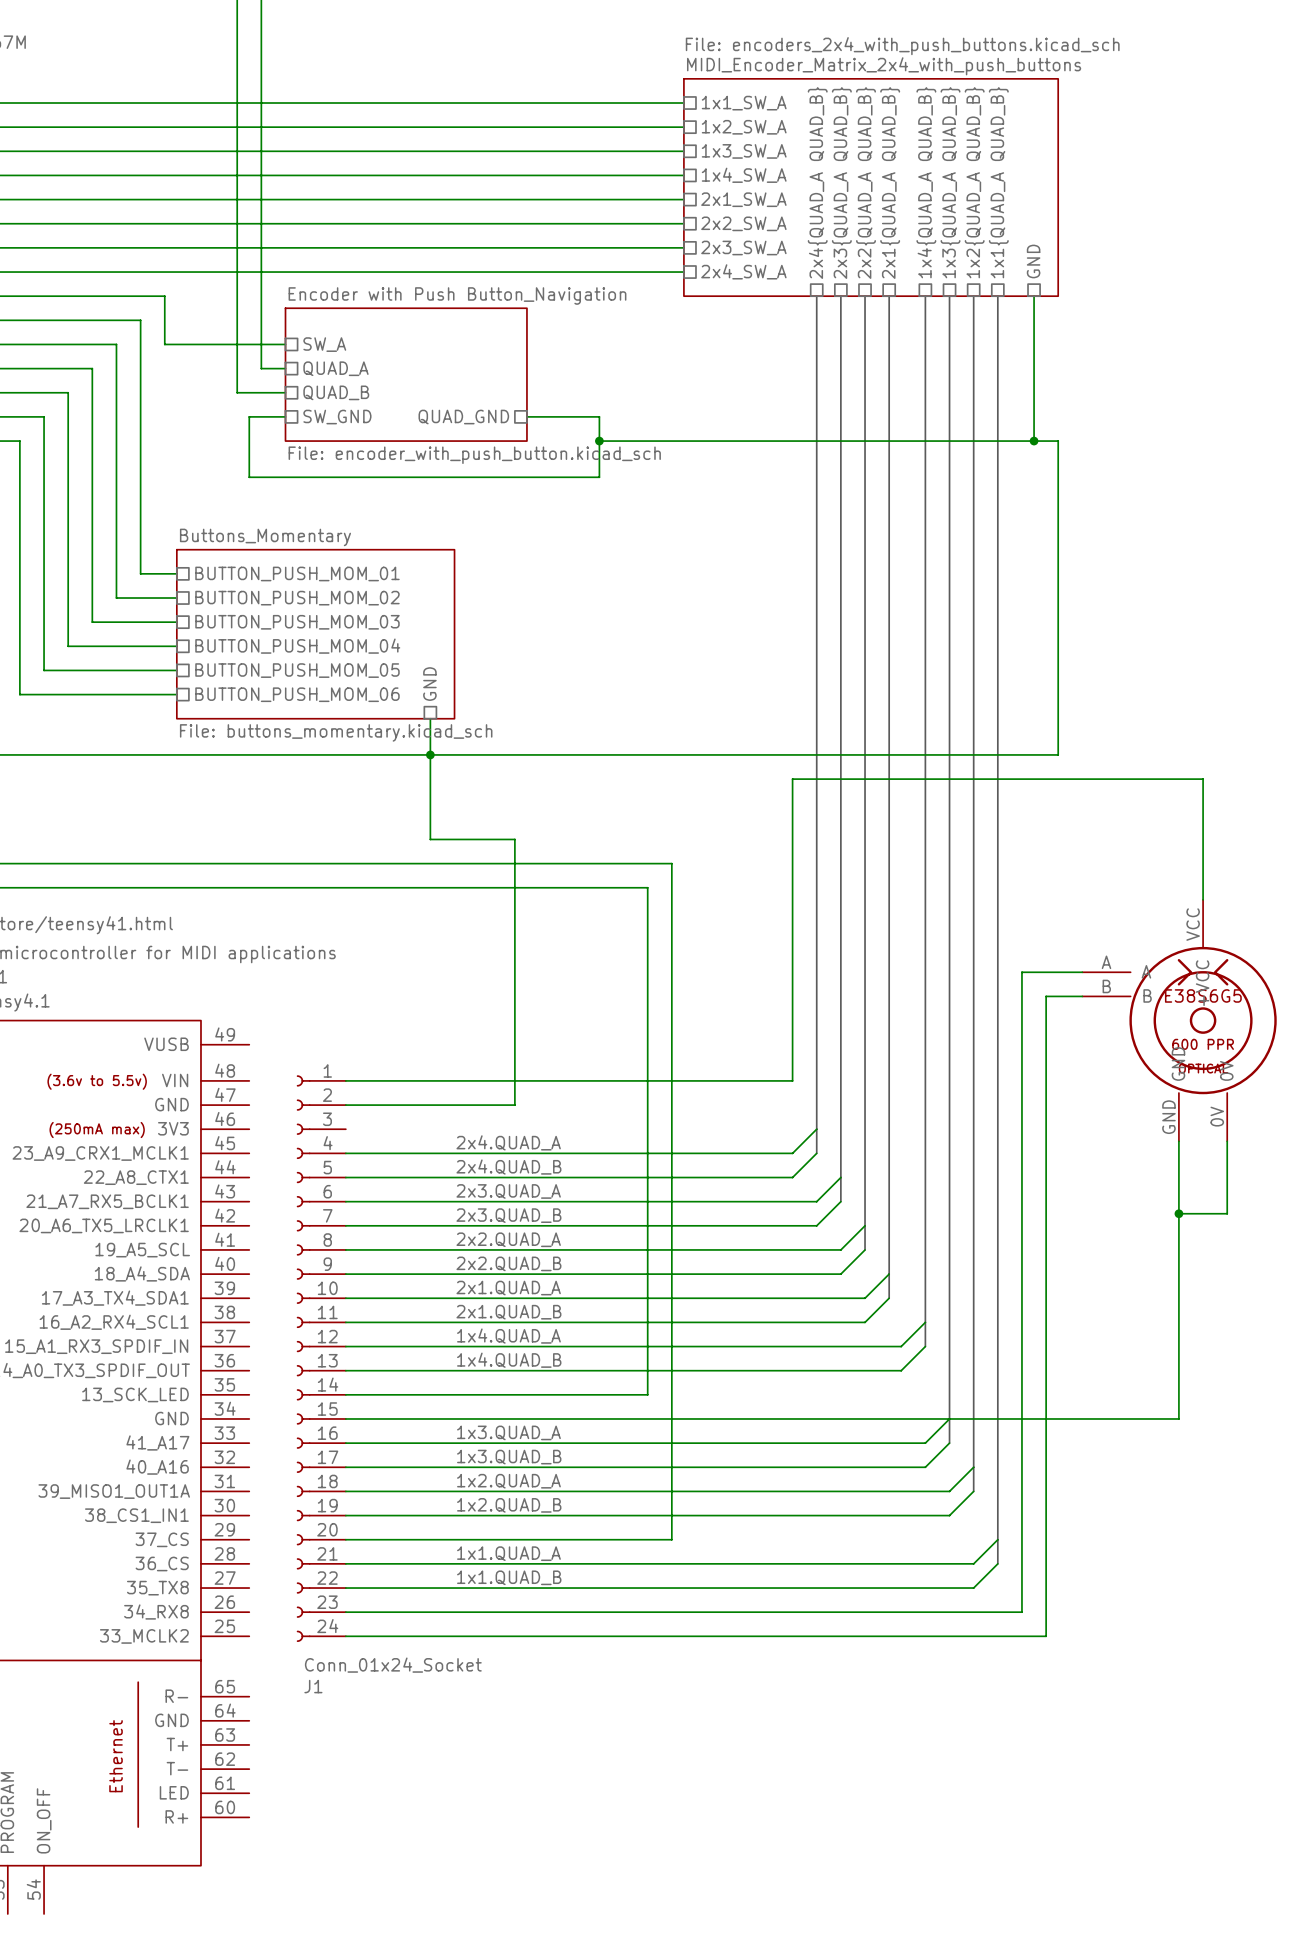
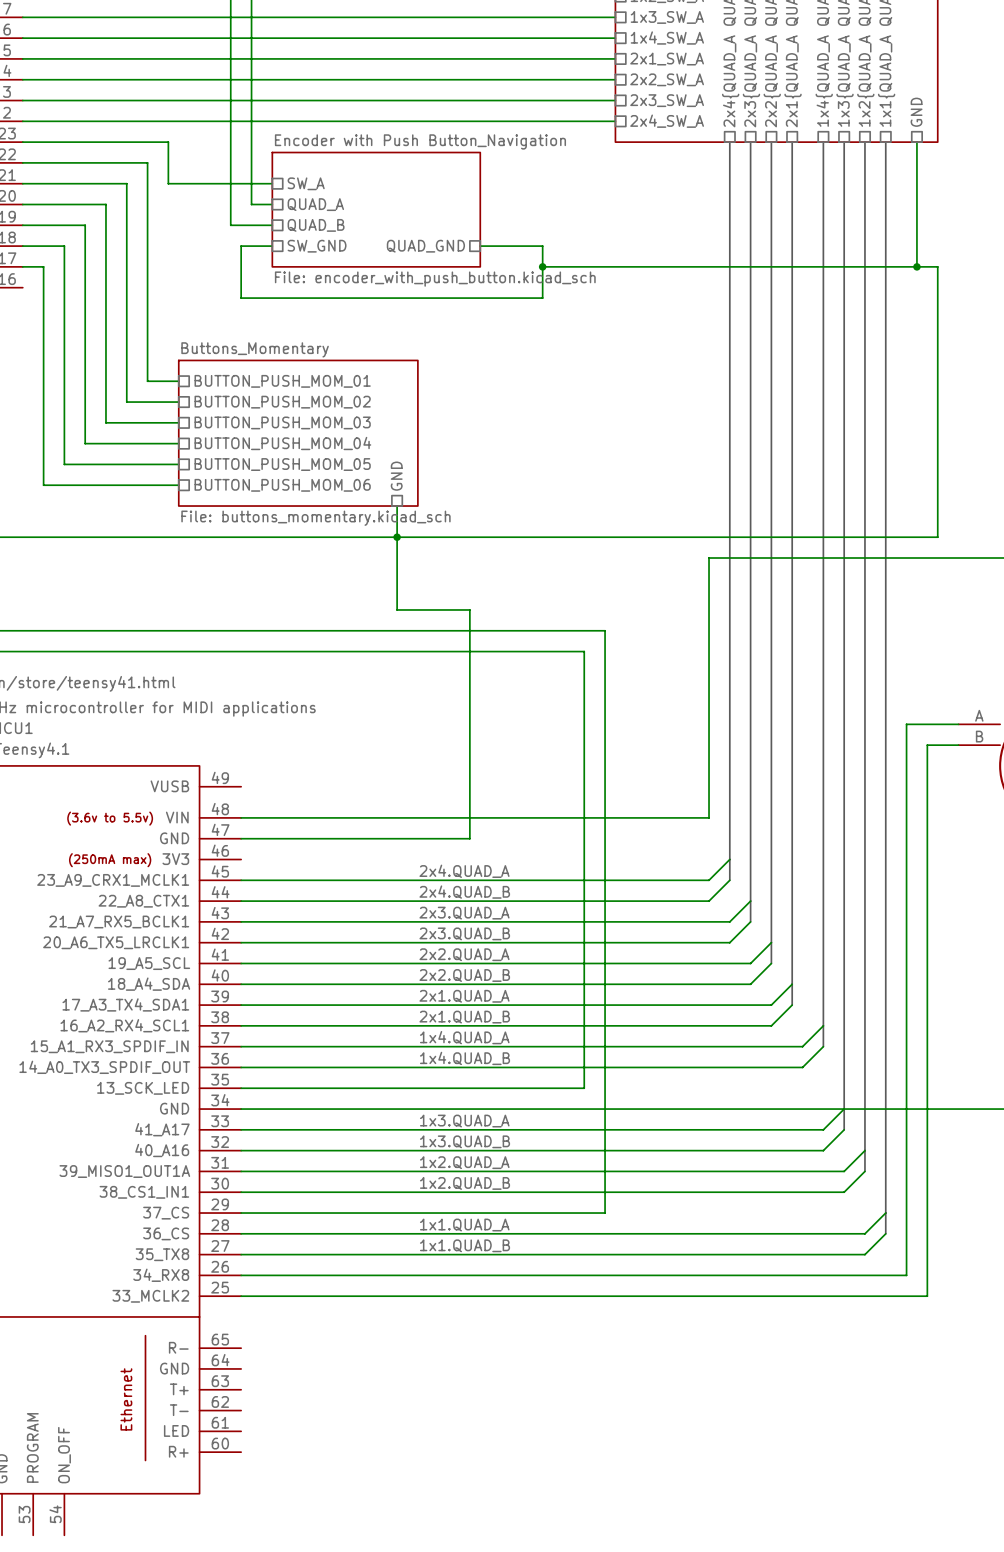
wire: none -> (241, 817) (324, 817)
wire: none -> (241, 838) (324, 838)
wire: none -> (241, 880) (324, 880)
wire: none -> (241, 901) (324, 901)
wire: none -> (241, 921) (324, 921)
wire: none -> (241, 942) (324, 942)
wire: none -> (241, 963) (324, 963)
wire: none -> (241, 984) (324, 984)
wire: none -> (241, 1005) (324, 1005)
wire: none -> (241, 1025) (324, 1025)
wire: none -> (241, 1046) (324, 1046)
J1: Conn_01x24_Socket (321, 1358) -> none
wire: none -> (241, 1067) (324, 1067)
wire: none -> (241, 1088) (324, 1088)
wire: none -> (241, 1109) (324, 1109)
wire: none -> (241, 1129) (324, 1129)
wire: none -> (241, 1150) (324, 1150)
wire: none -> (241, 1171) (324, 1171)
wire: none -> (241, 1192) (324, 1192)
wire: none -> (241, 1213) (324, 1213)
wire: none -> (241, 1233) (324, 1233)
wire: none -> (241, 1254) (324, 1254)
wire: none -> (241, 1275) (324, 1275)
wire: none -> (241, 1296) (324, 1296)

